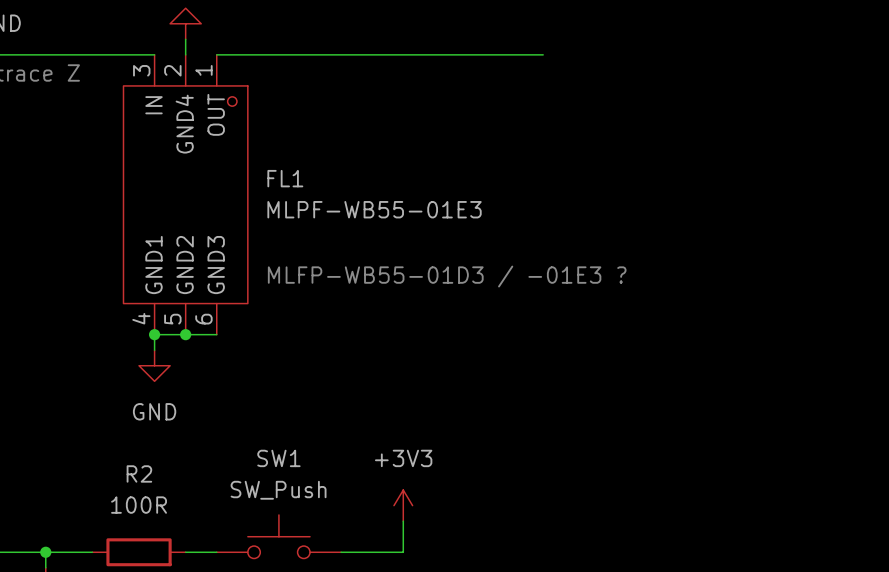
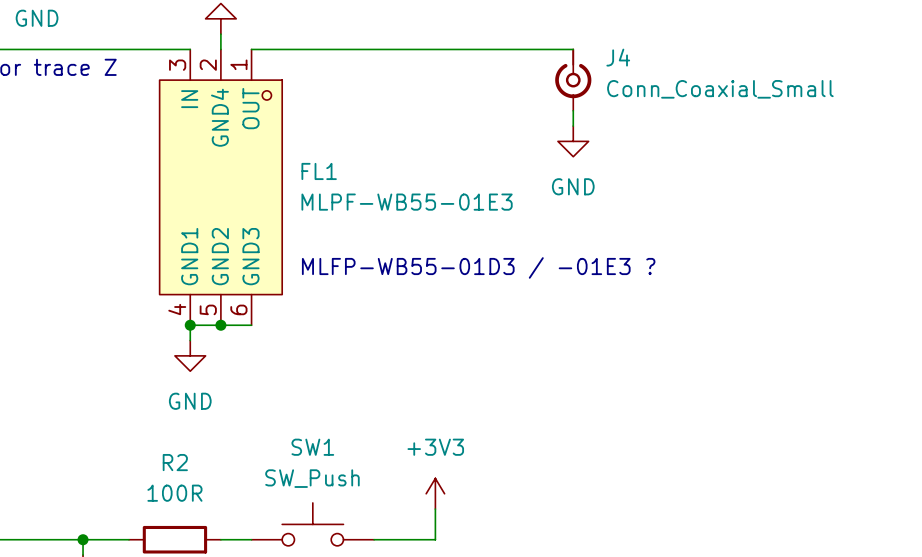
J4: none -> Conn_Coaxial_Small (573, 80)
wire: none -> (573, 110) (573, 126)
power symbol: none -> GND (573, 141)

